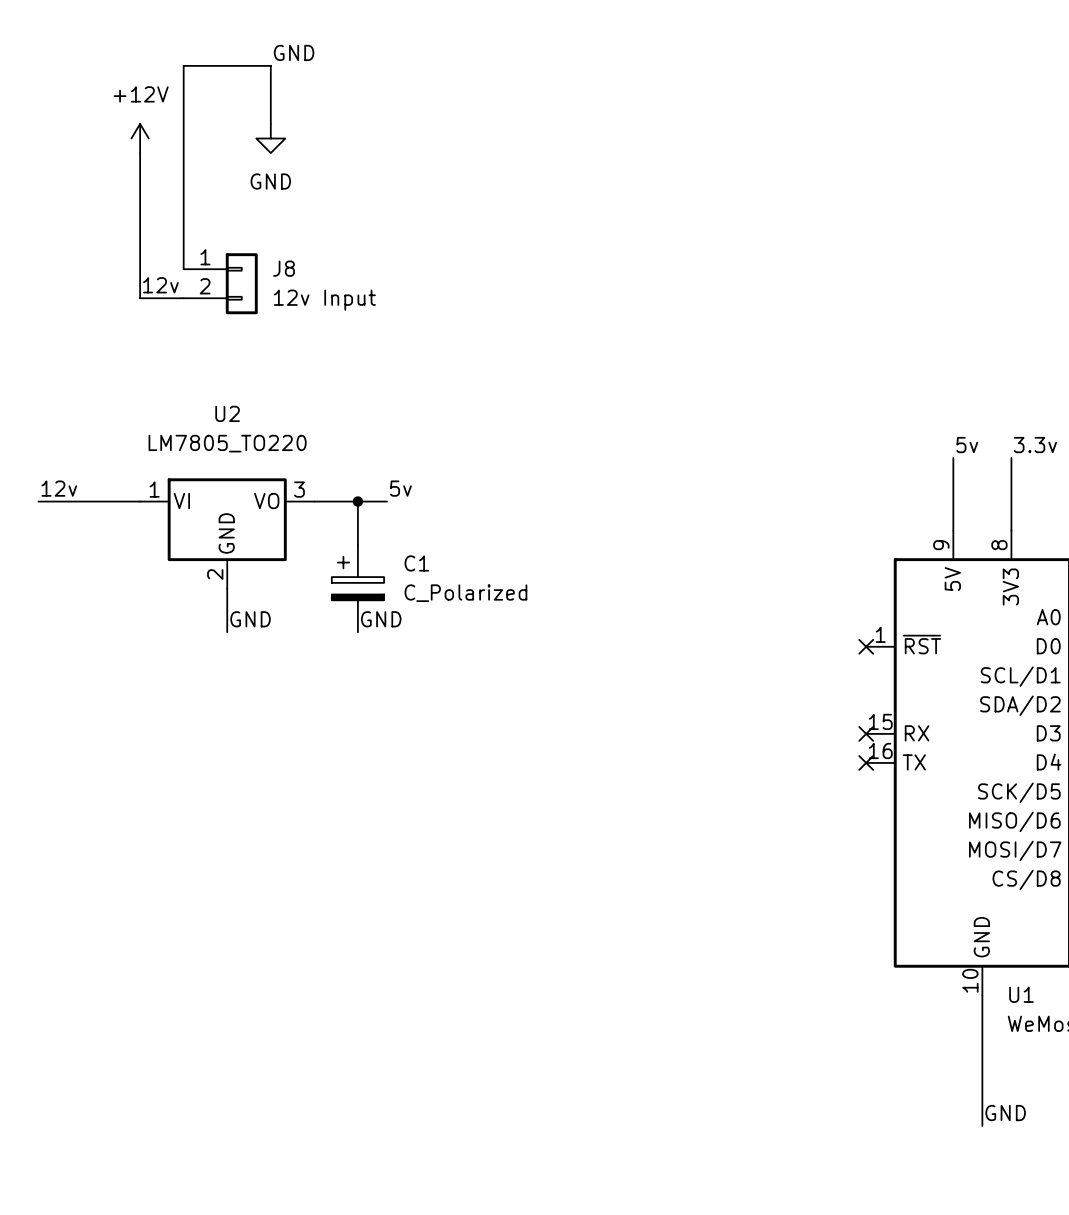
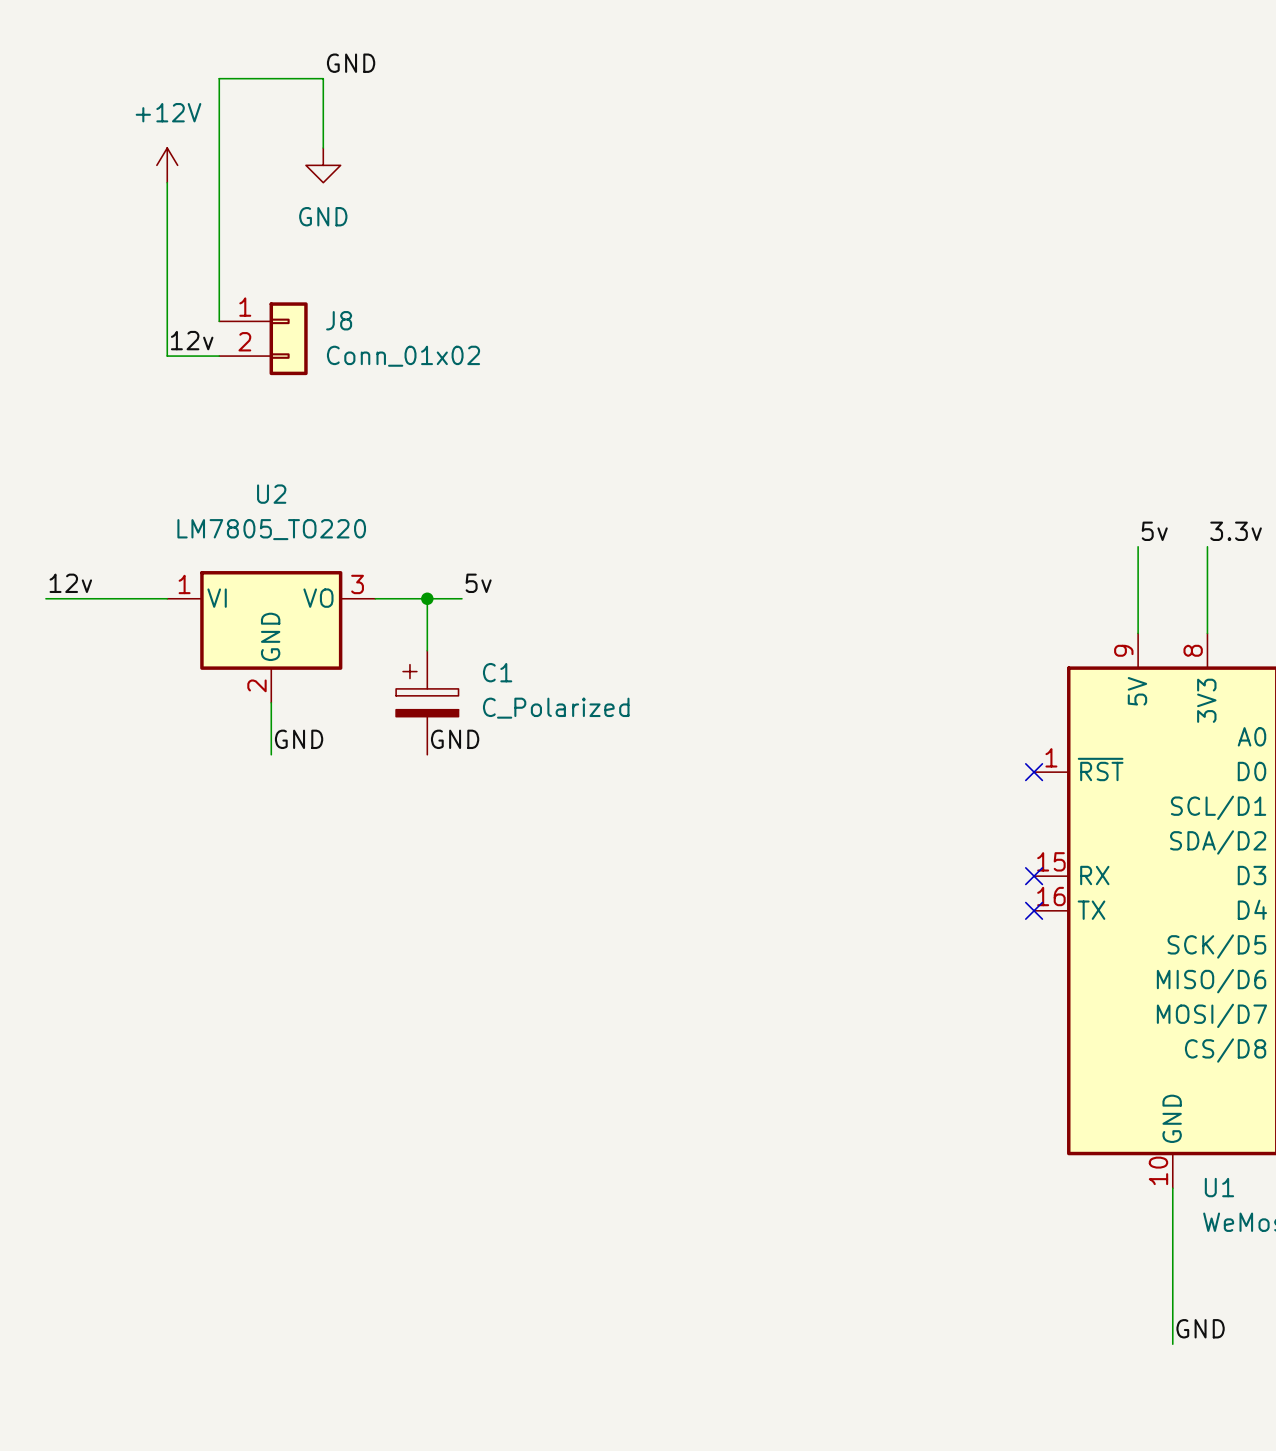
J8 value: 12v Input (324, 300) -> Conn_01x02 (403, 356)

